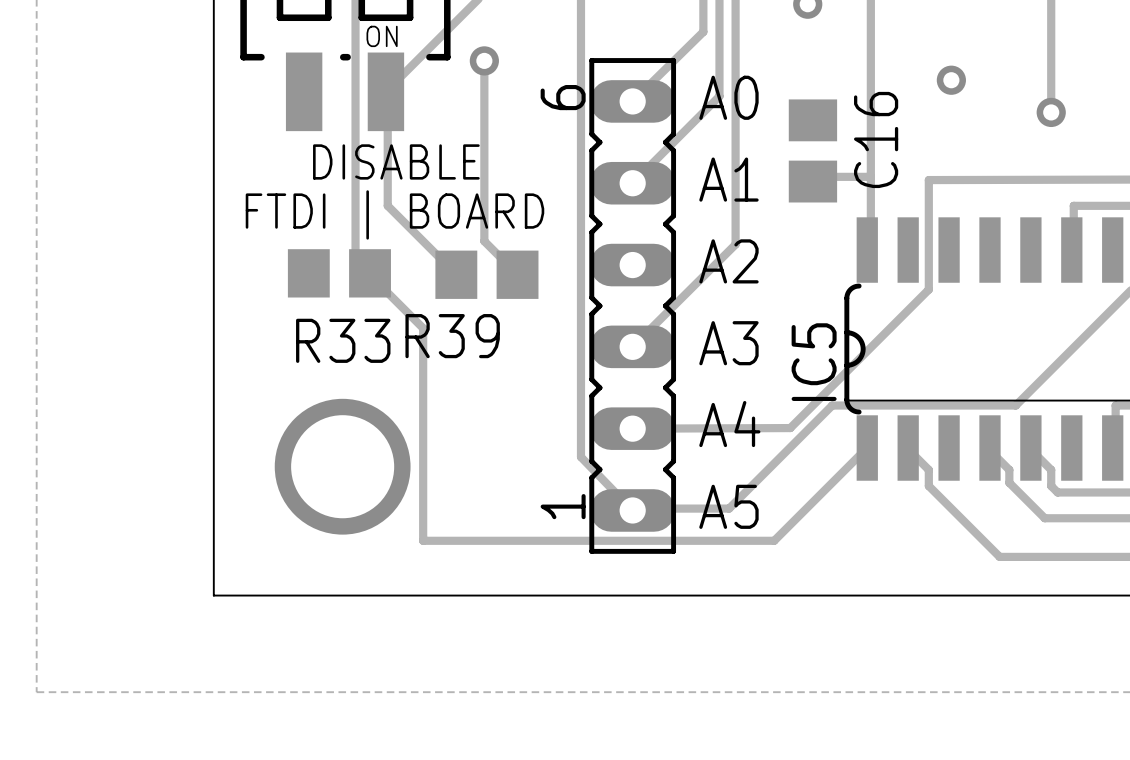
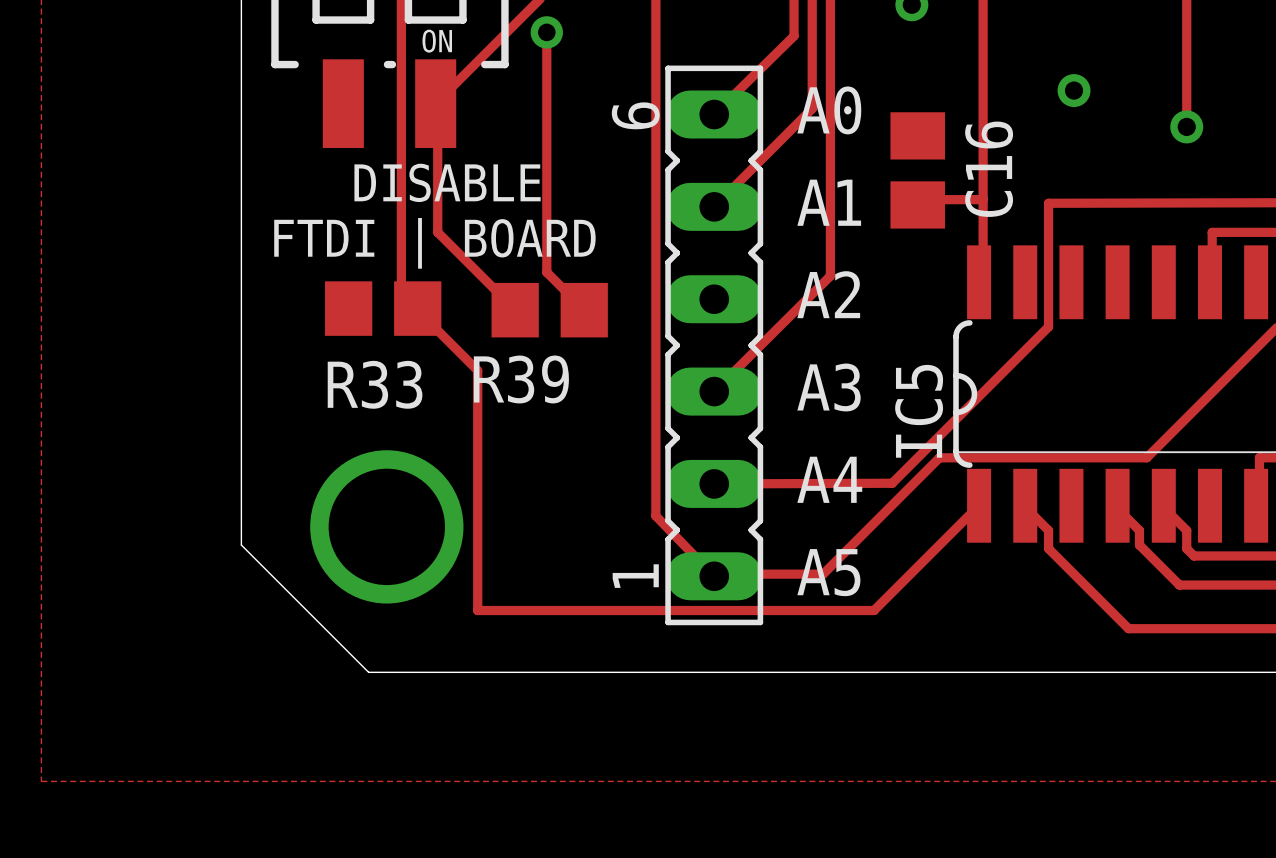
track: none -> (546, 32) (546, 68)
via: none -> (546, 32)
via: (484, 60) -> none
board edge: (213, 482) (213, 595) (326, 595) -> (241, 545) (368, 672)

